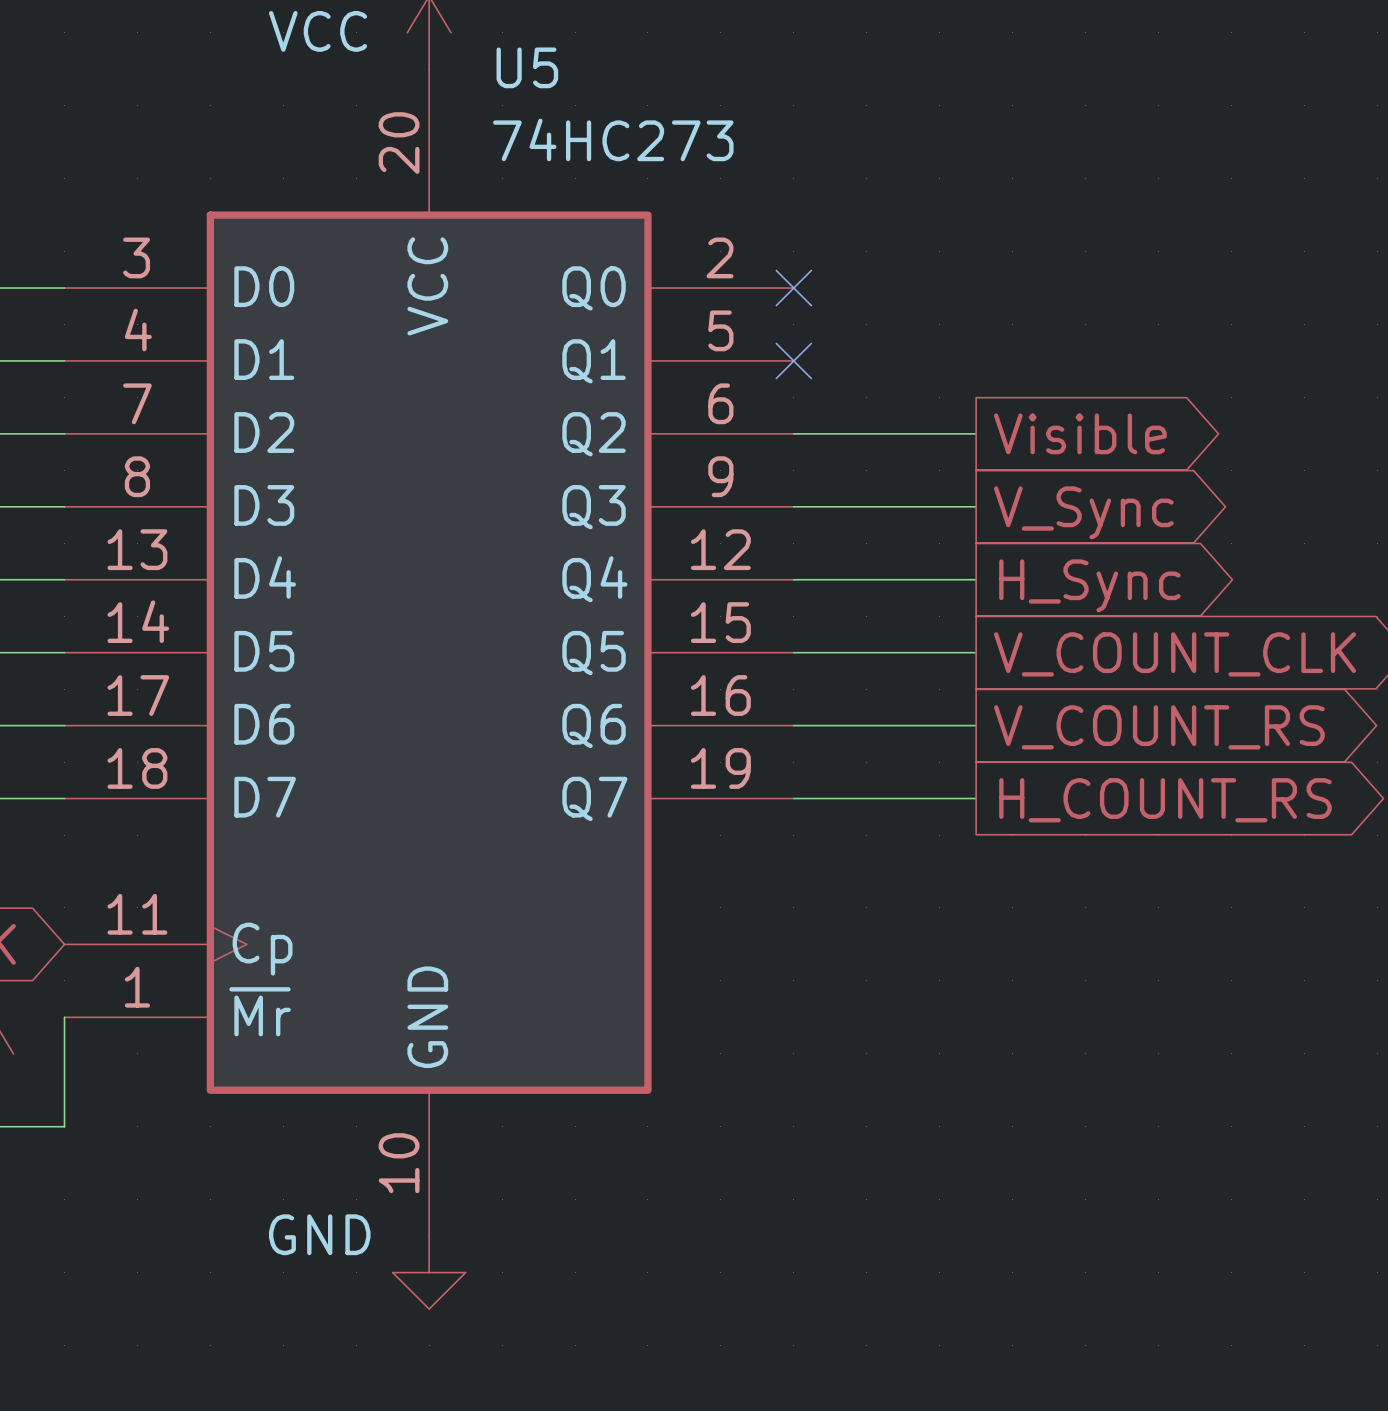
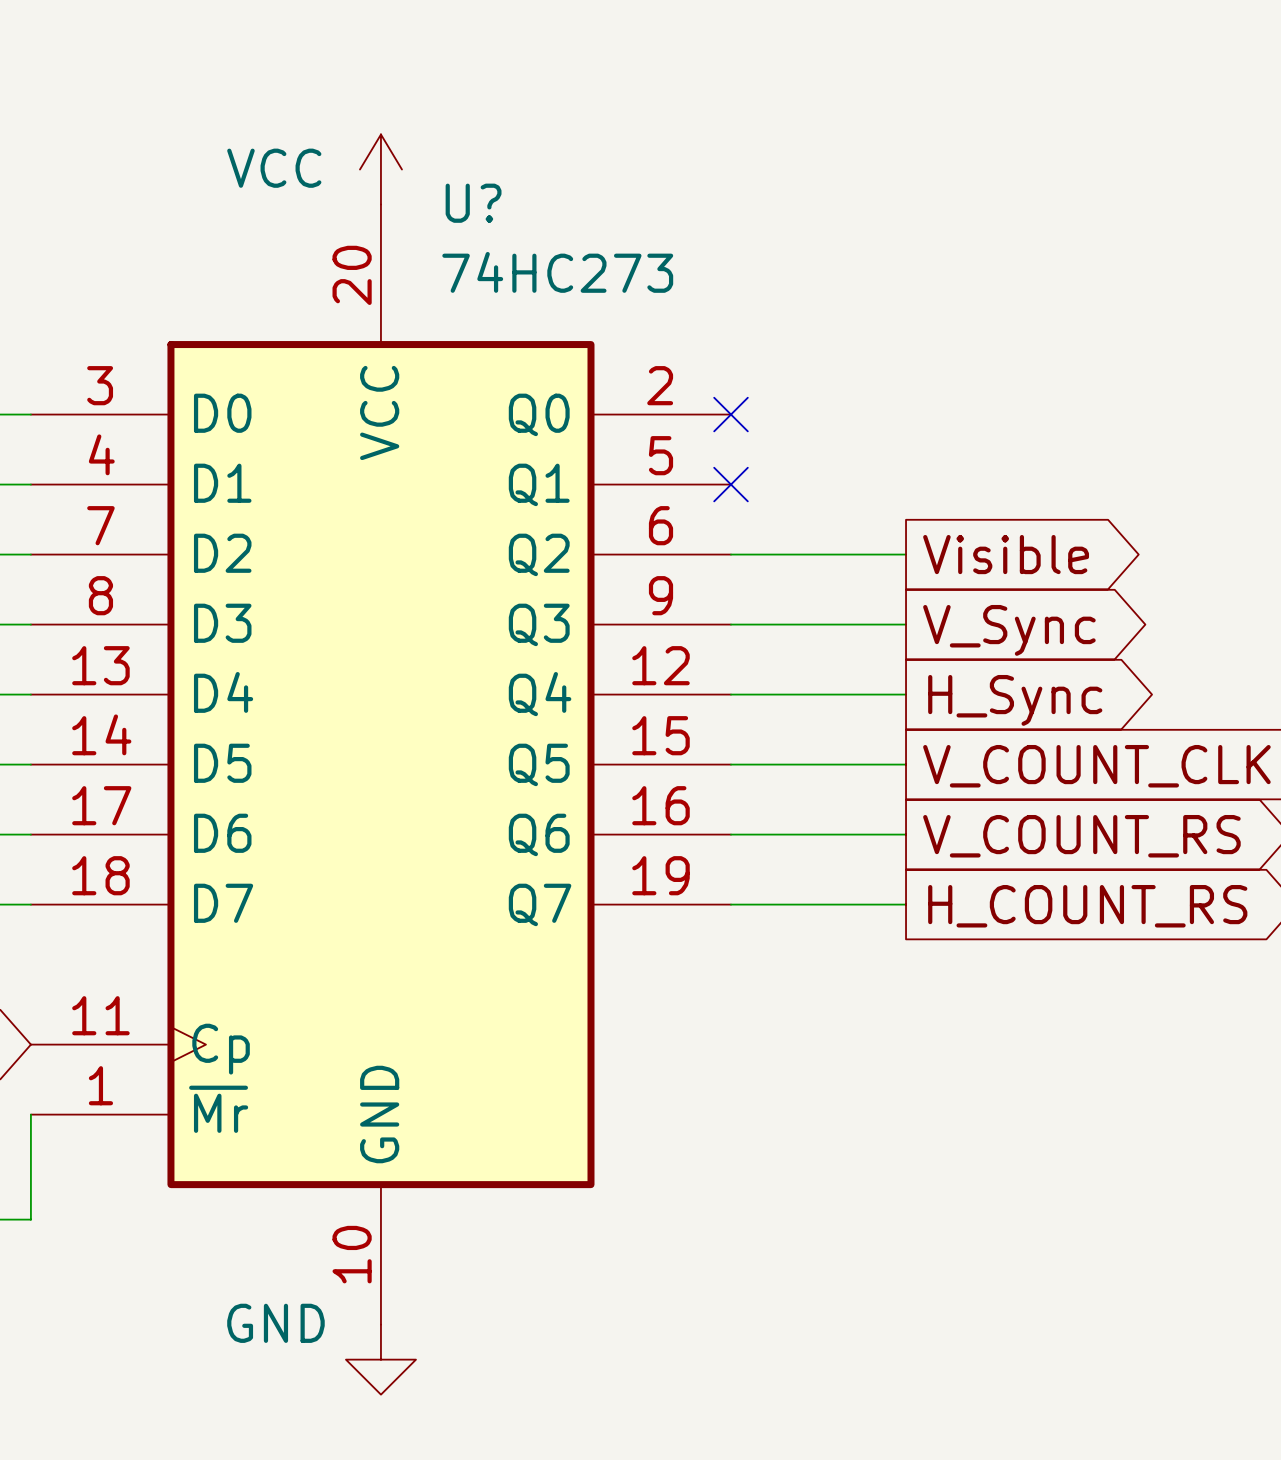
U5 name: U5 (527, 67) -> U? (473, 203)

